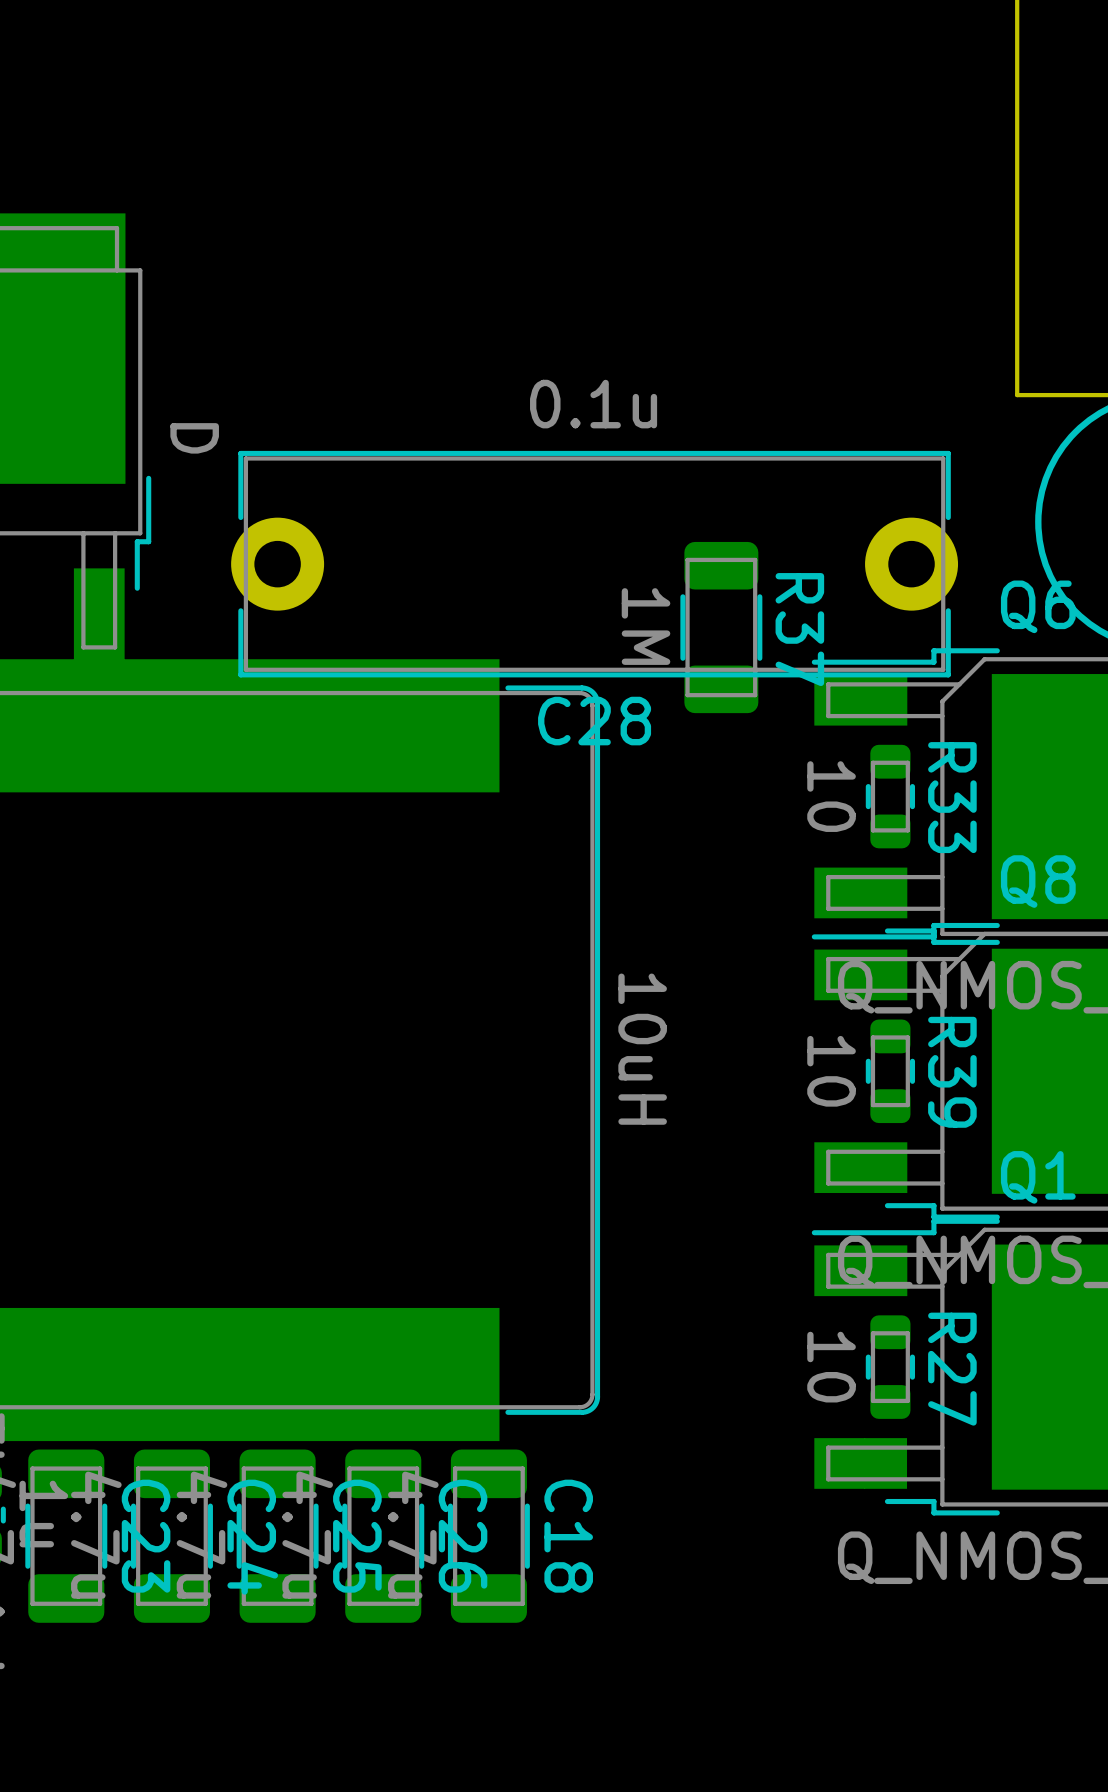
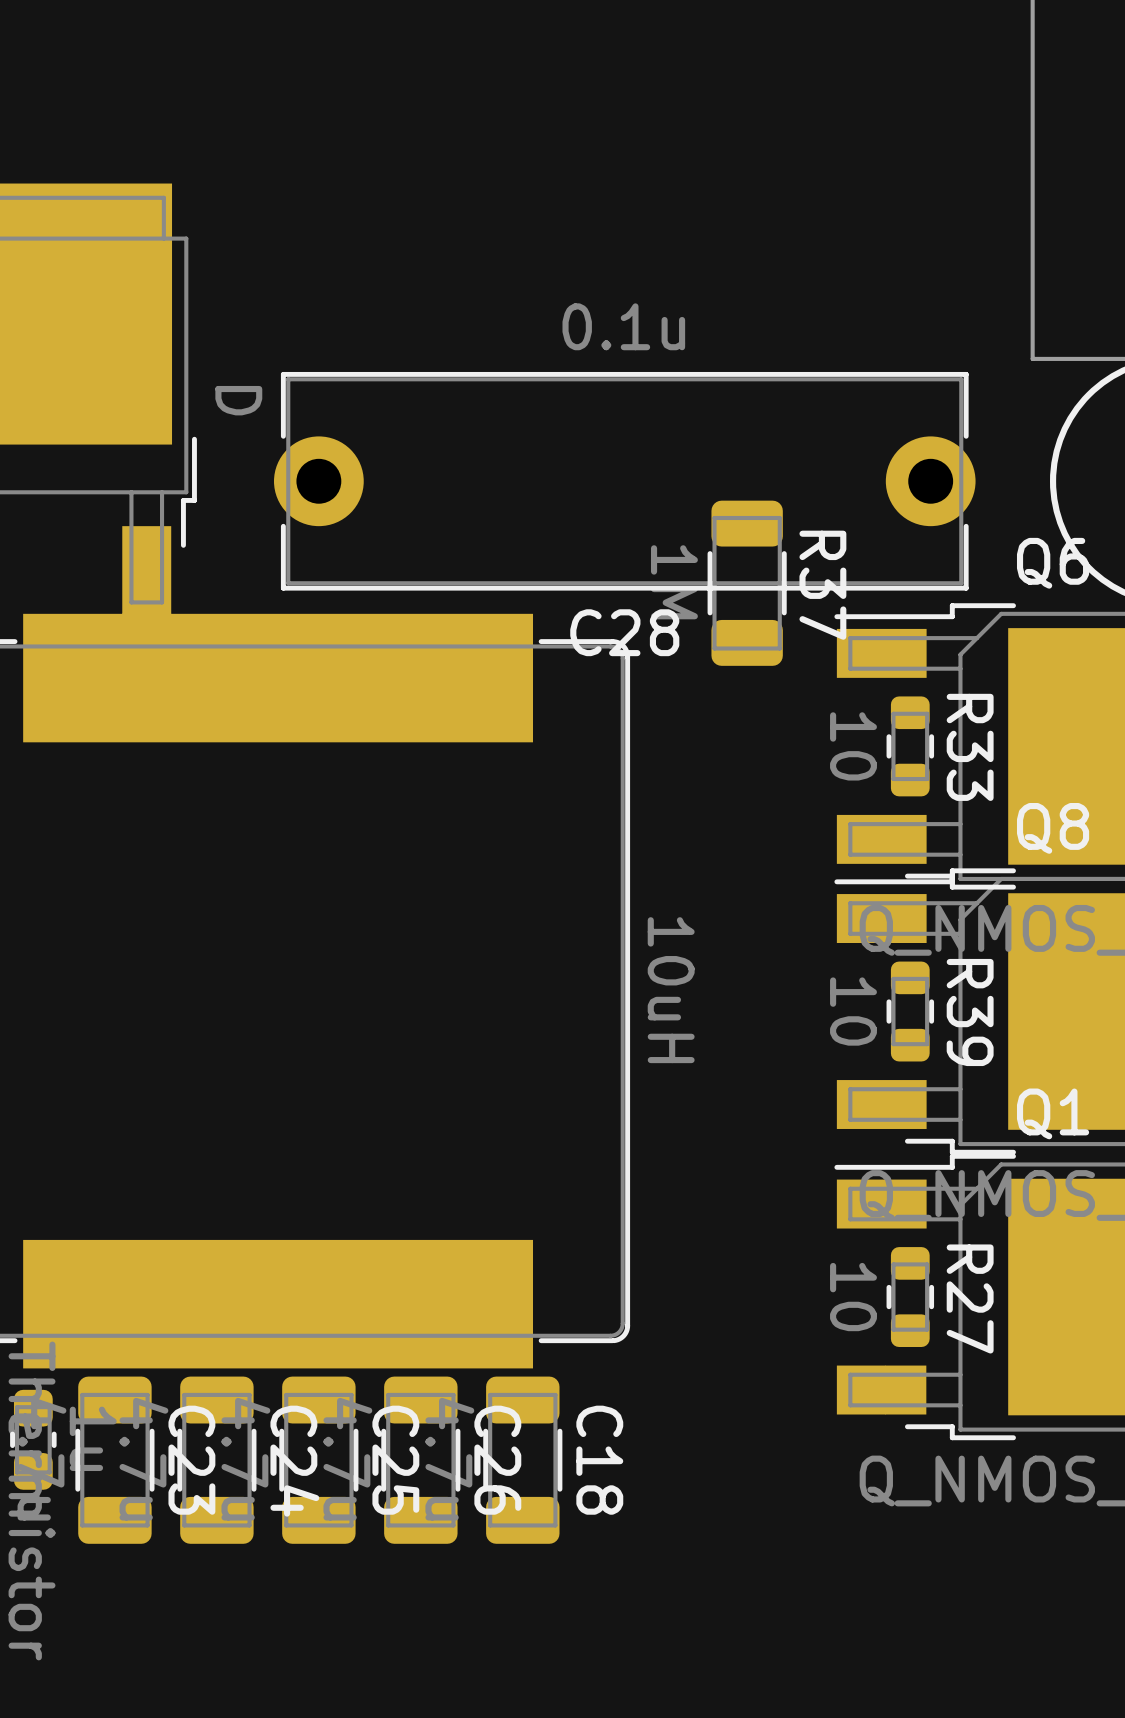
C28 position: (594, 564) -> (624, 481)

